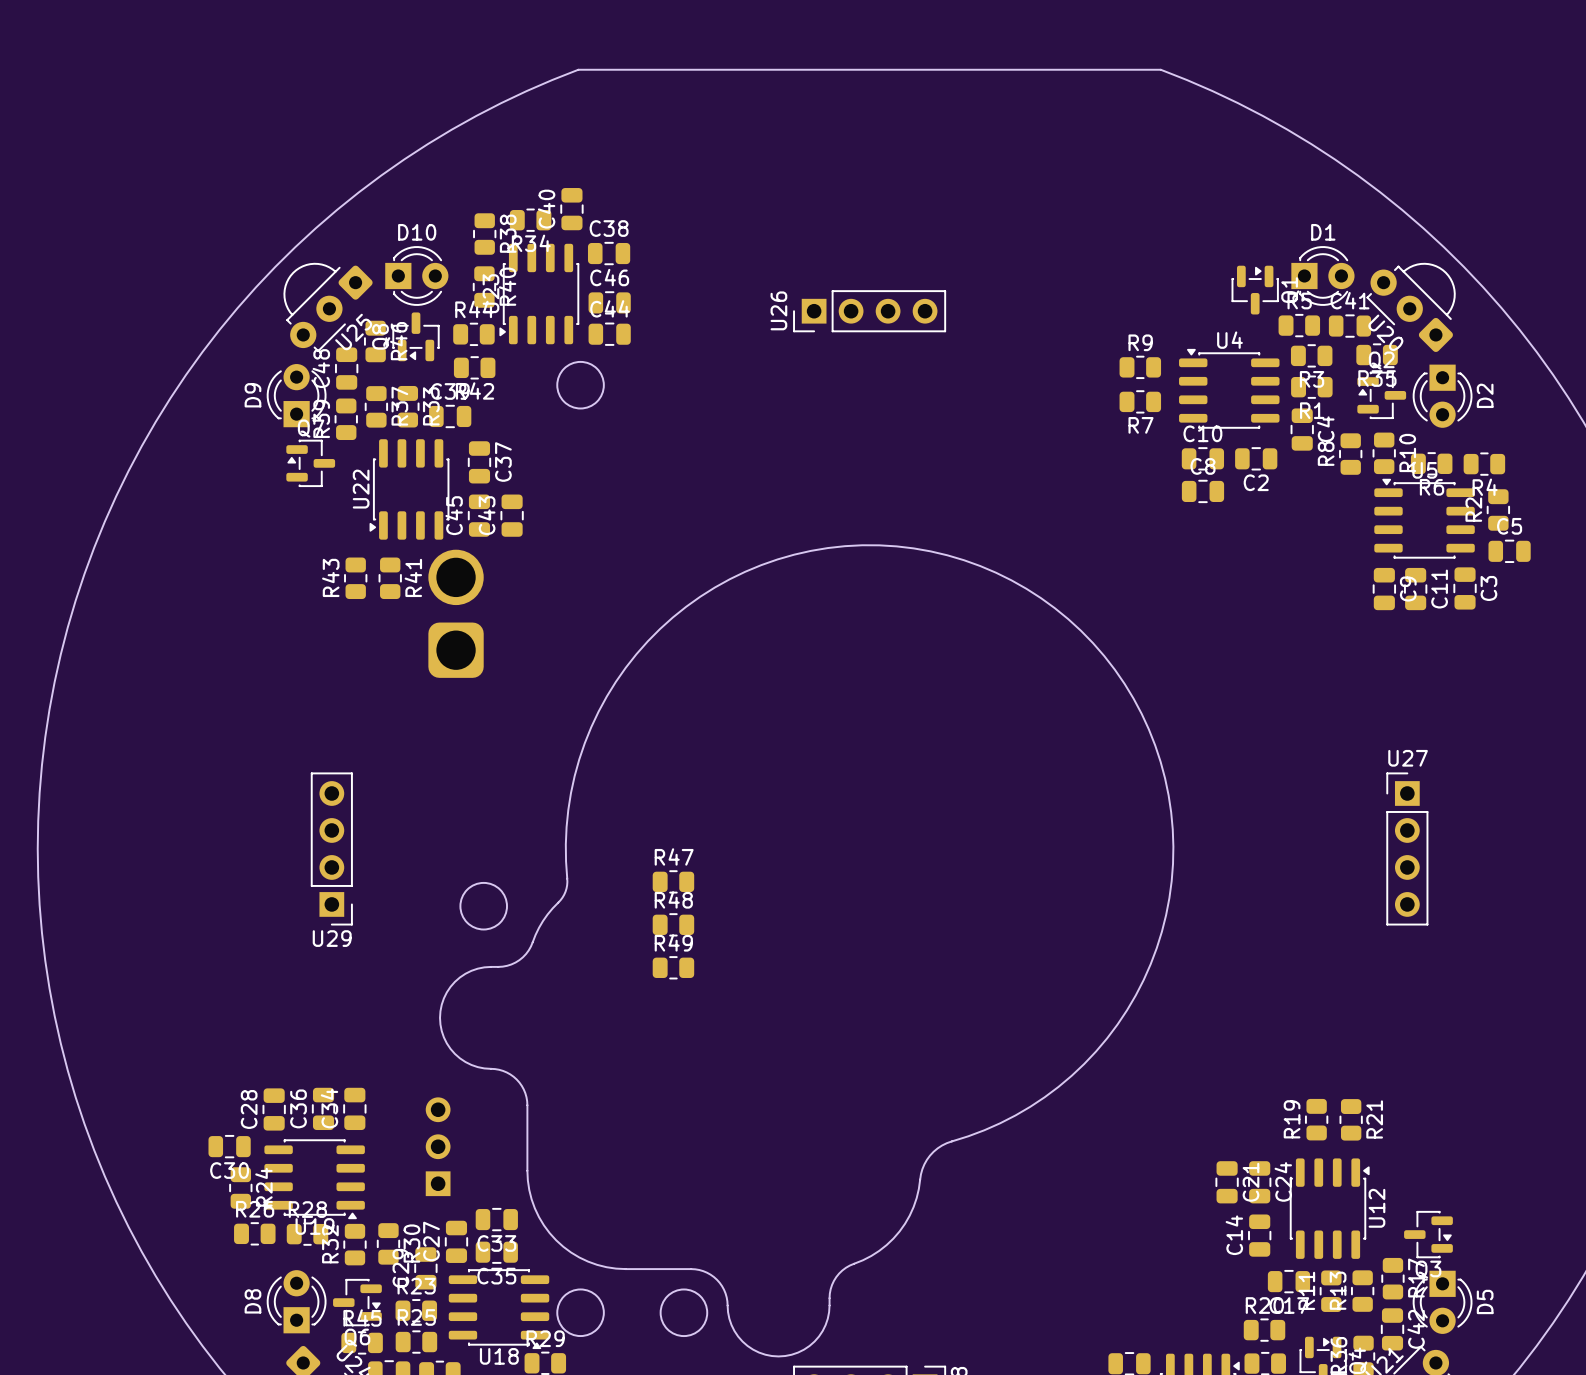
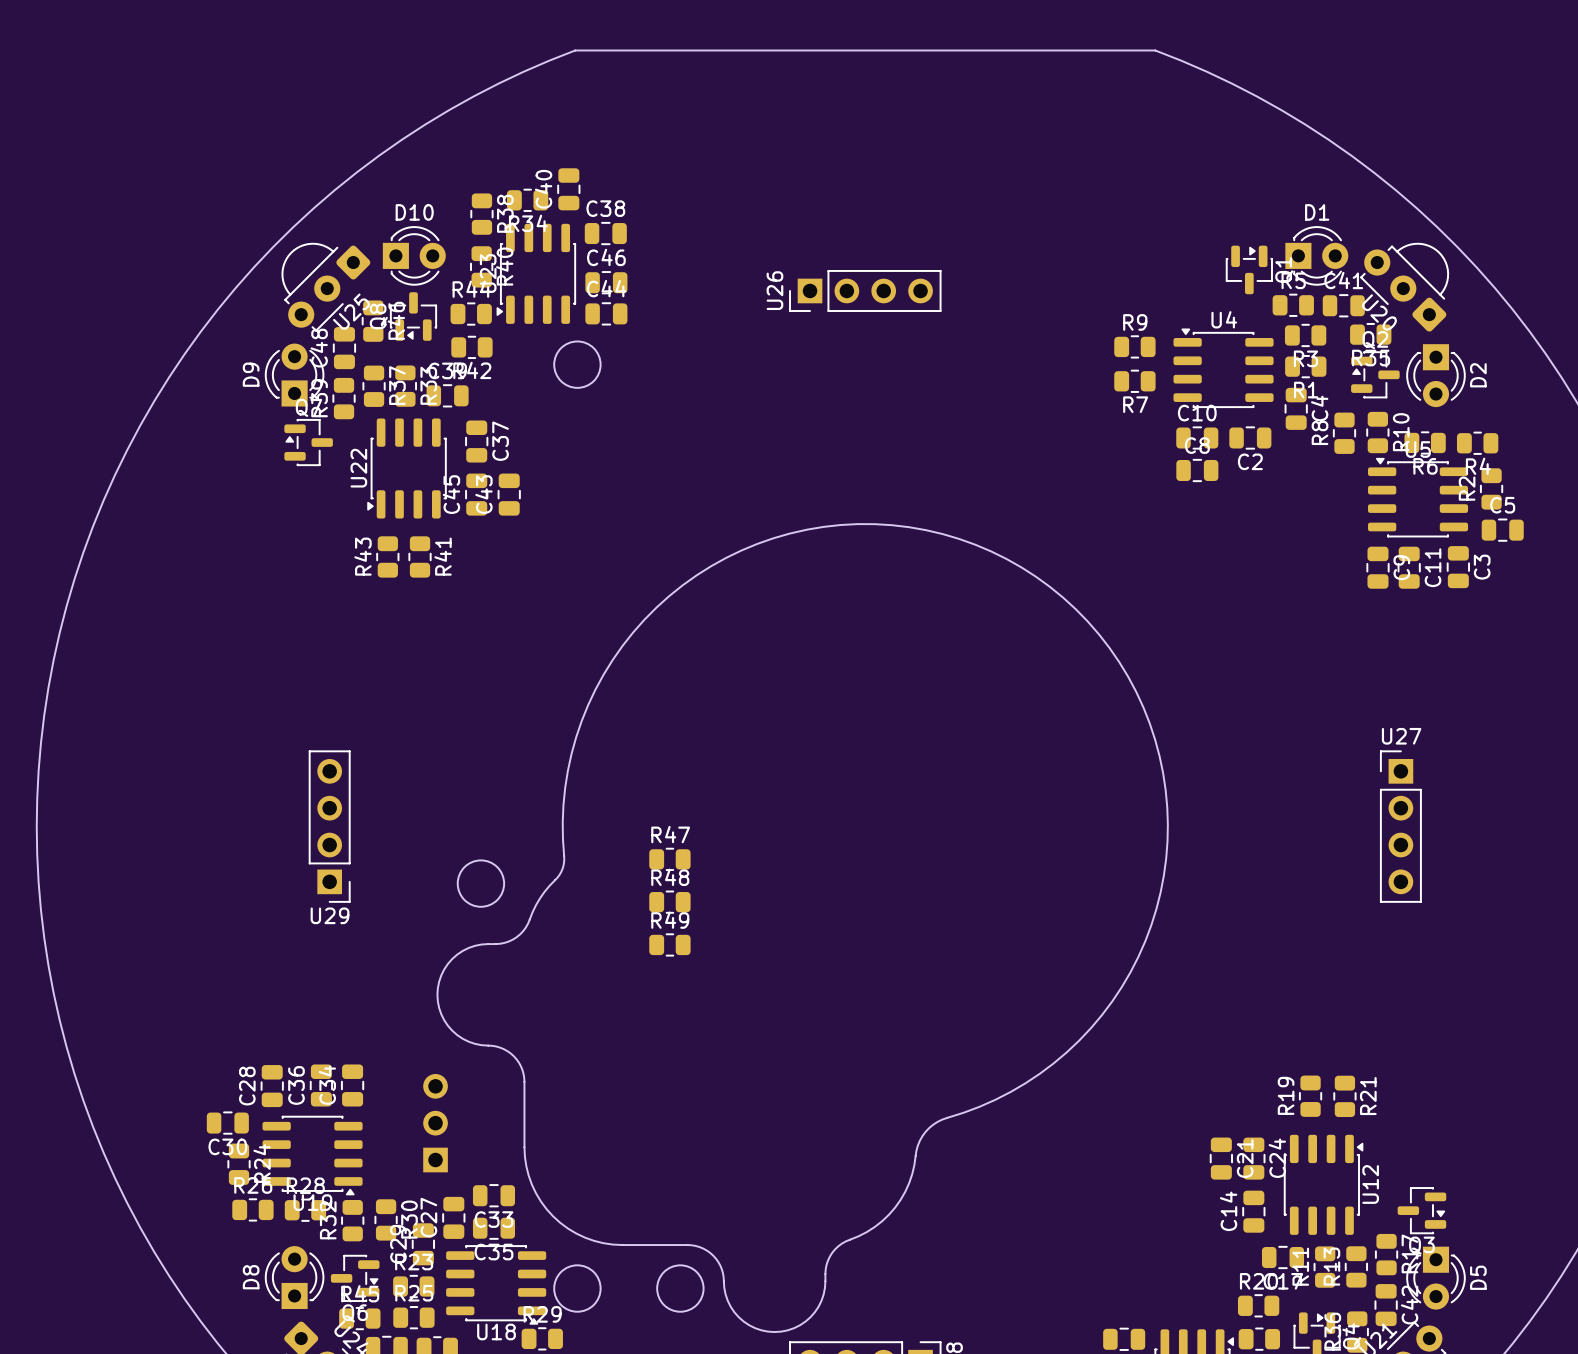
R41 name: R41 (413, 577) -> R43 (363, 556)
R43: (355, 578) -> none
R41: none -> (420, 556)
part: (456, 613) -> none

